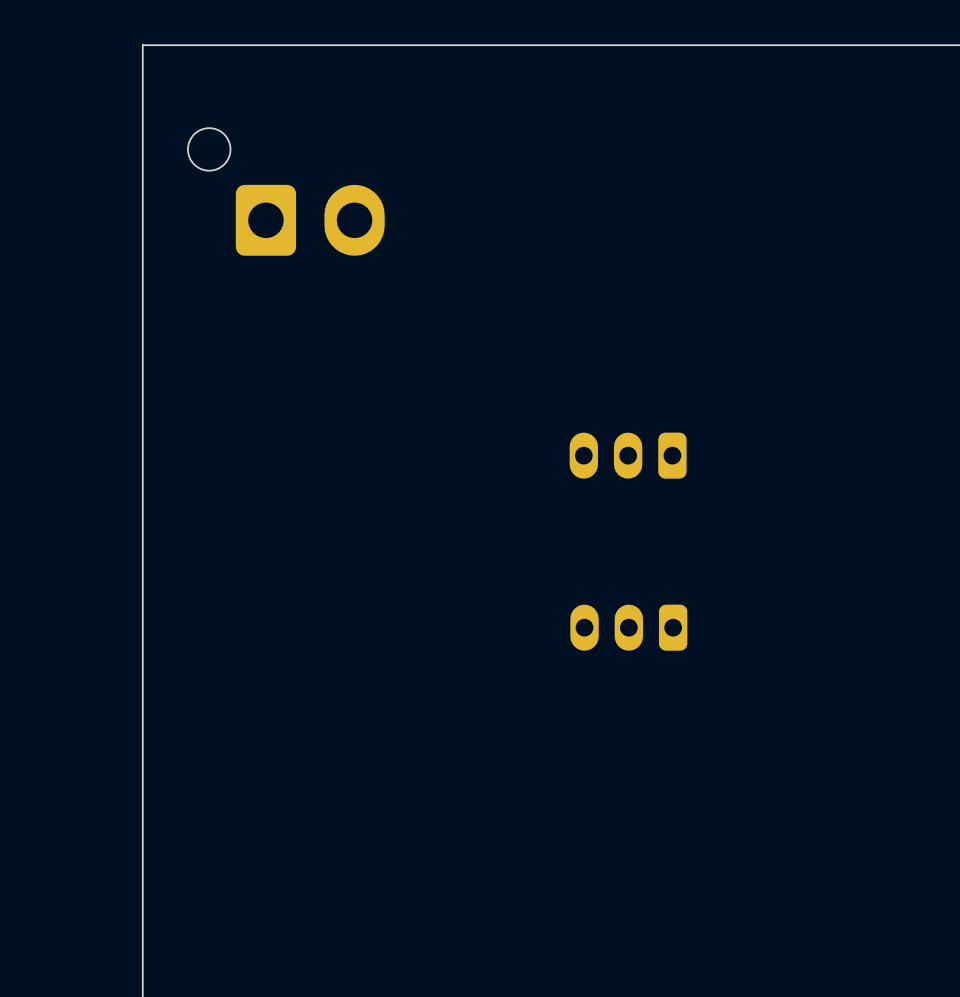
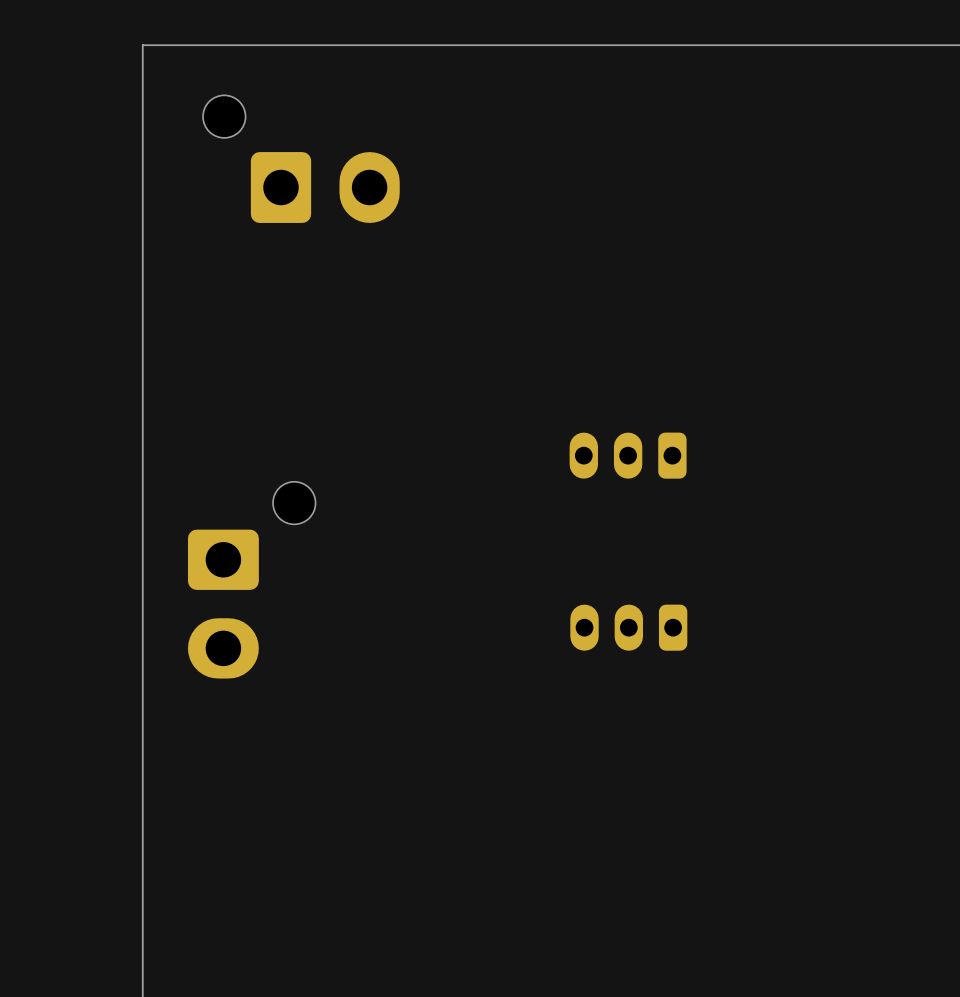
part position: (286, 191) -> (301, 159)
part: none -> (251, 580)

